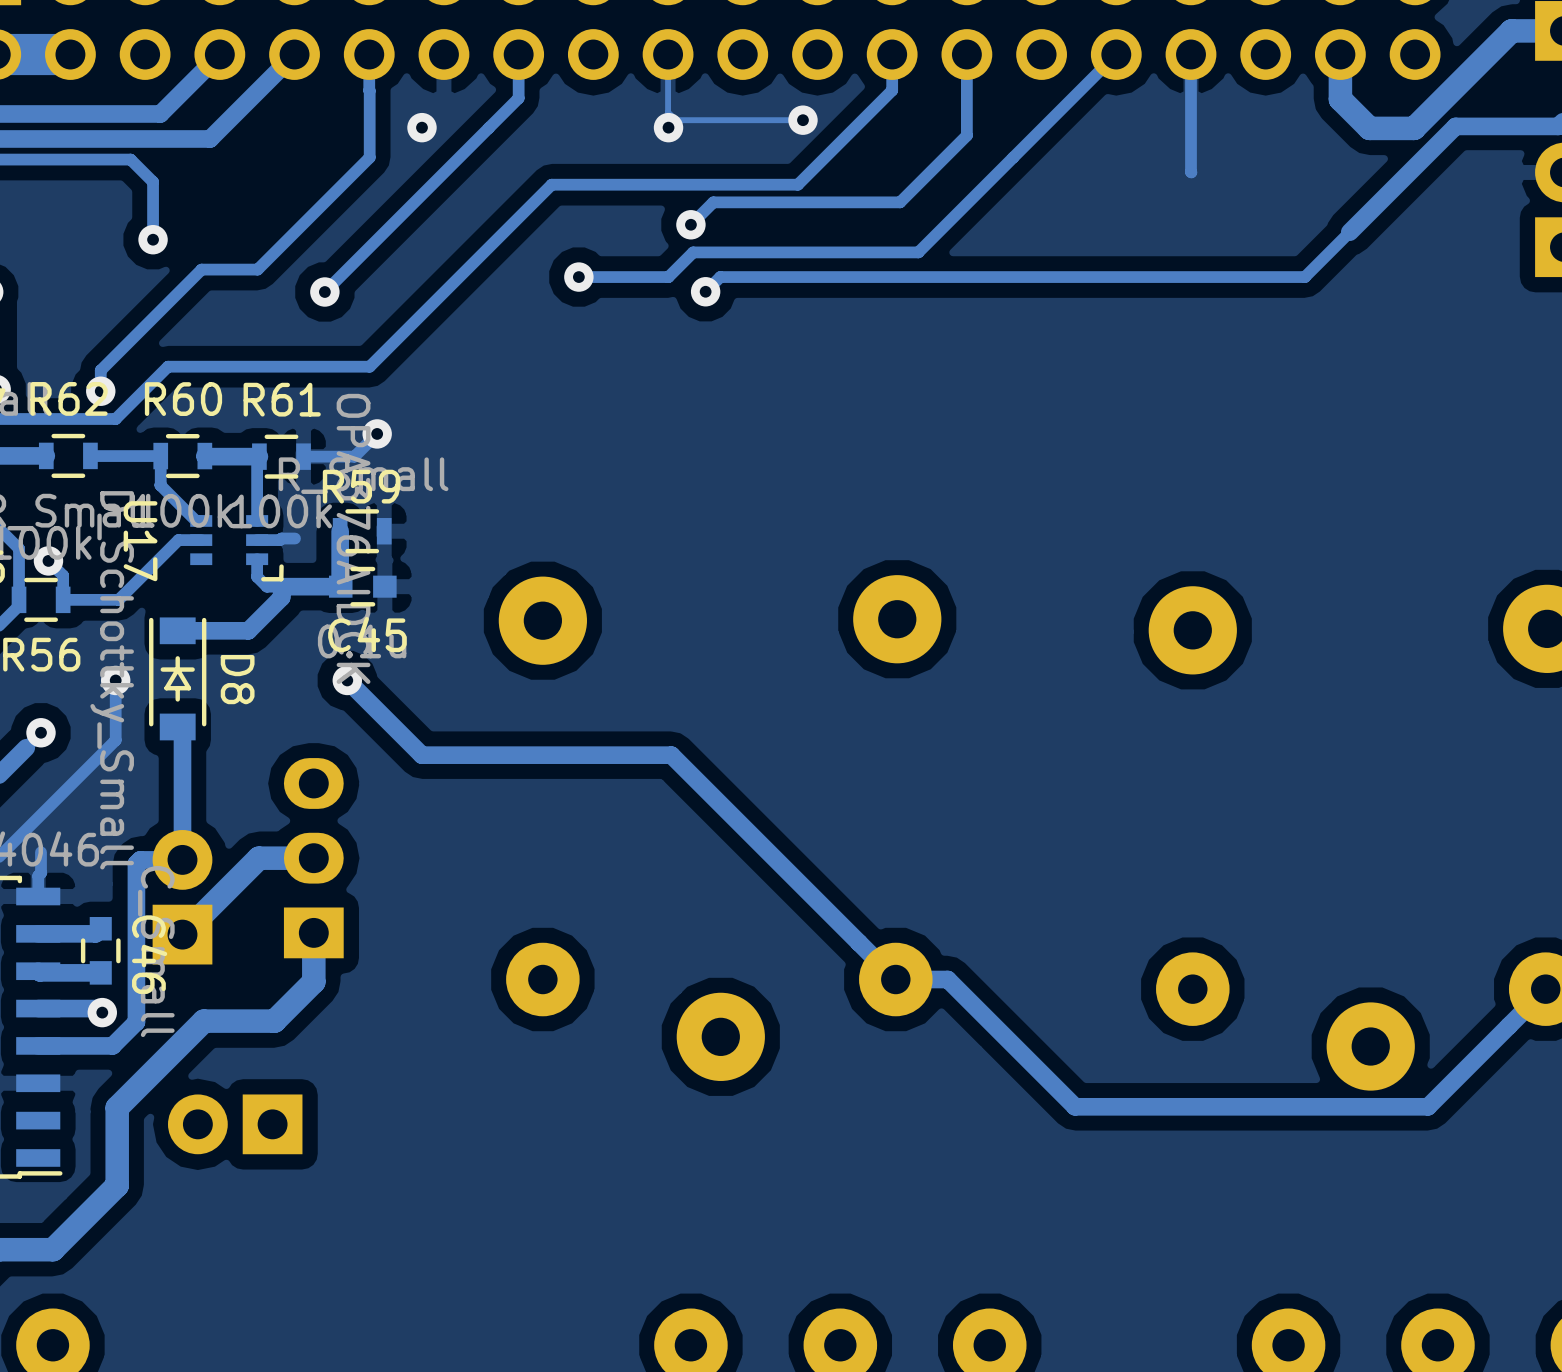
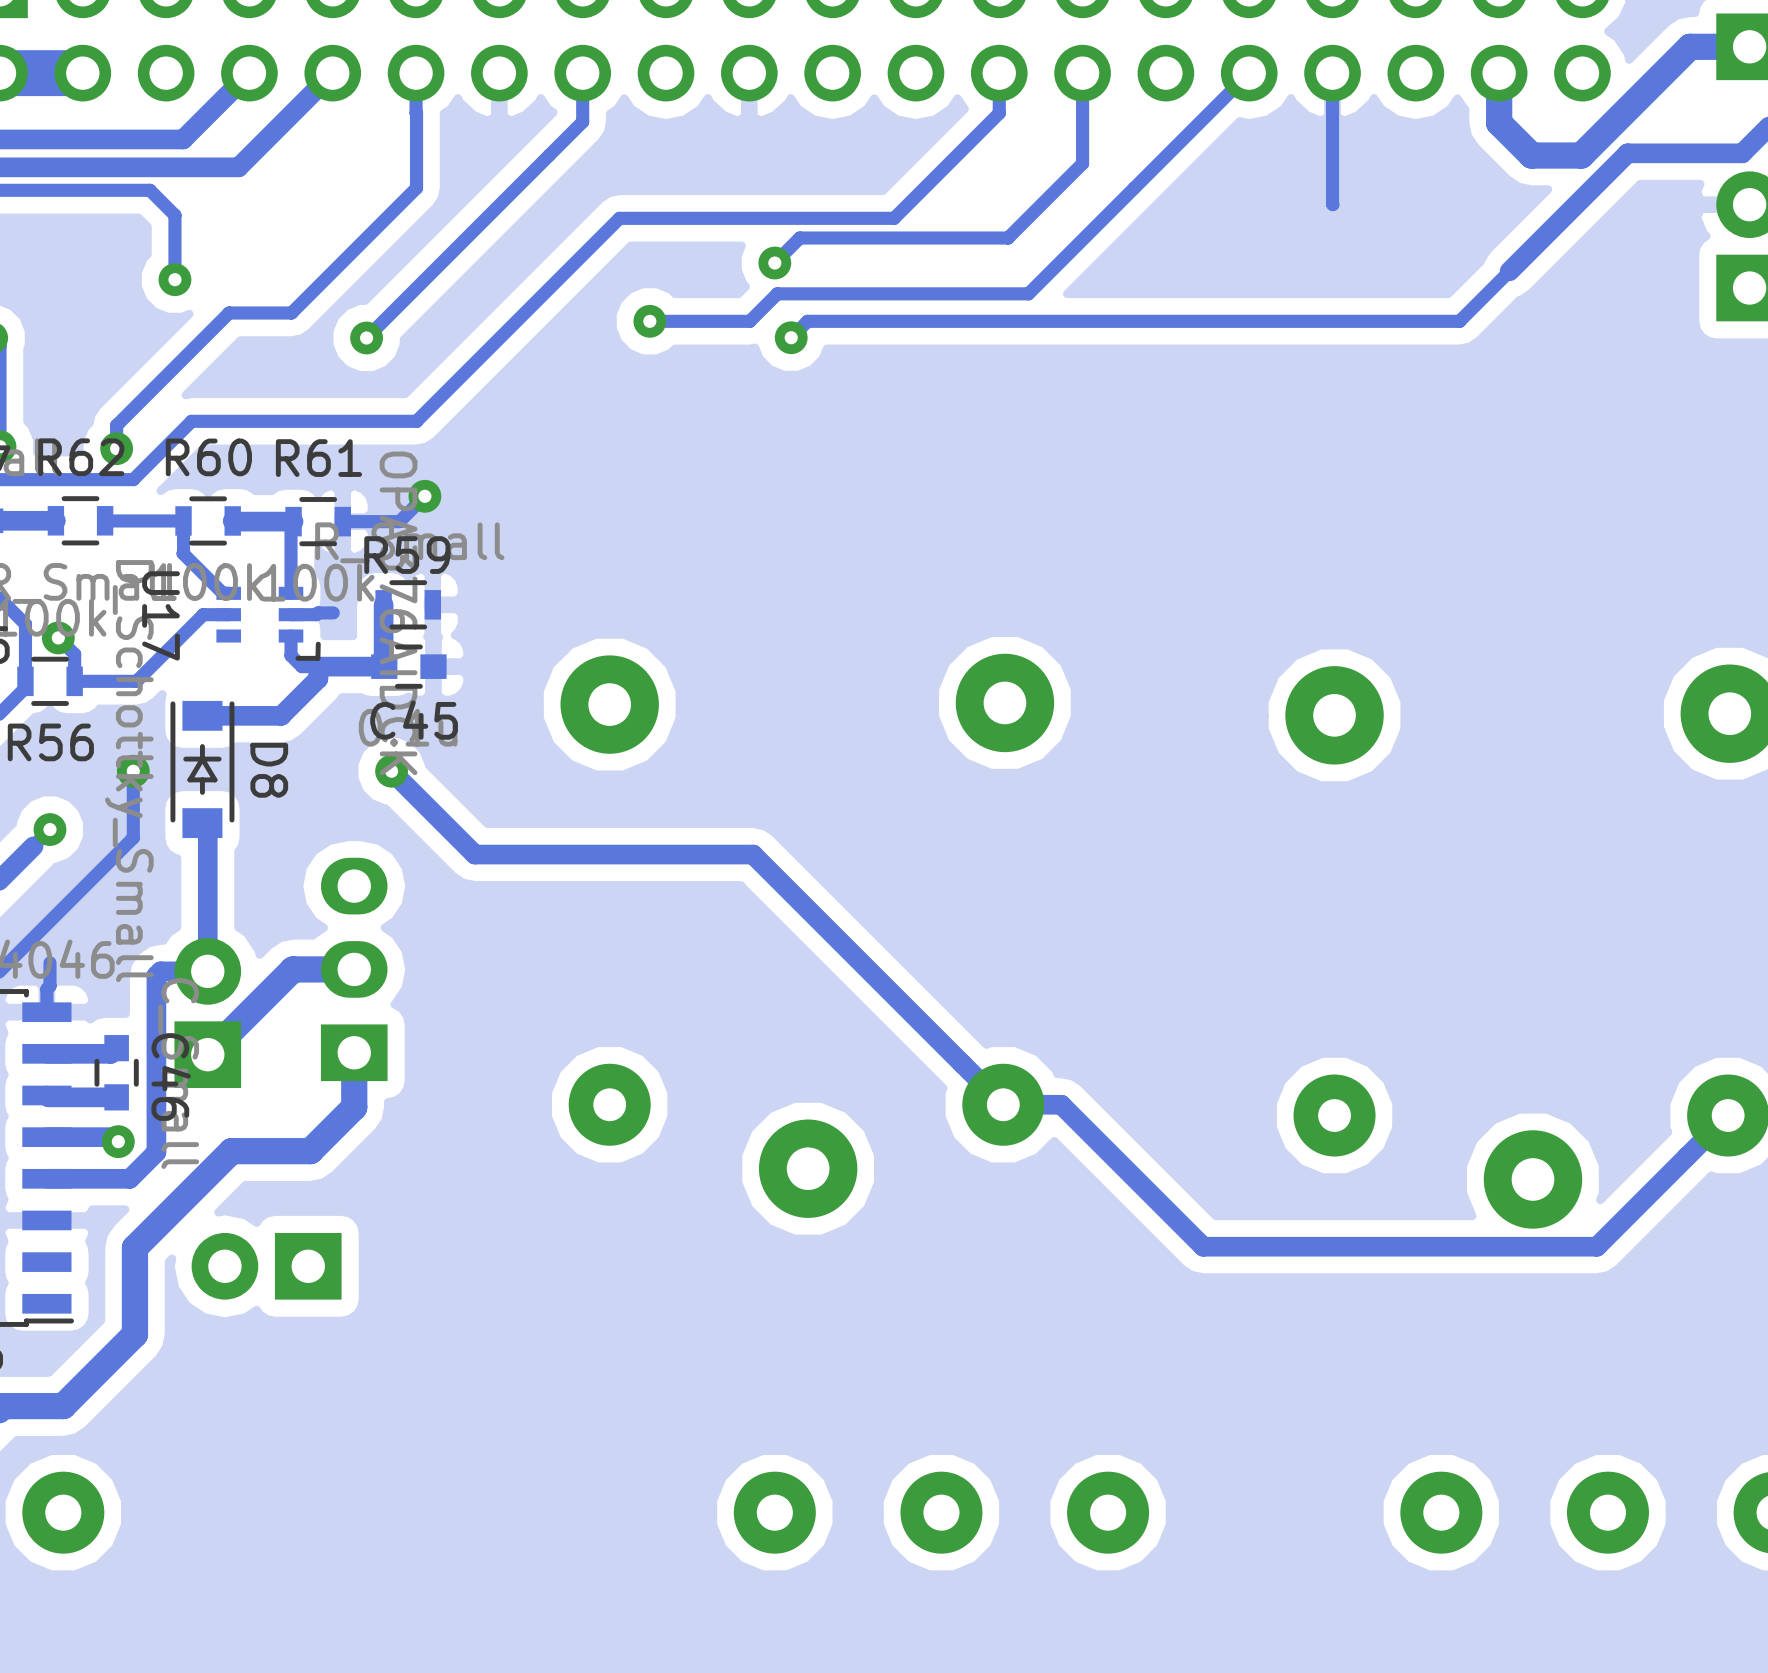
track: (668, 54) (668, 112) (675, 120) (802, 120) -> none
via: (802, 120) -> none
via: (421, 127) -> none
via: (668, 127) -> none

